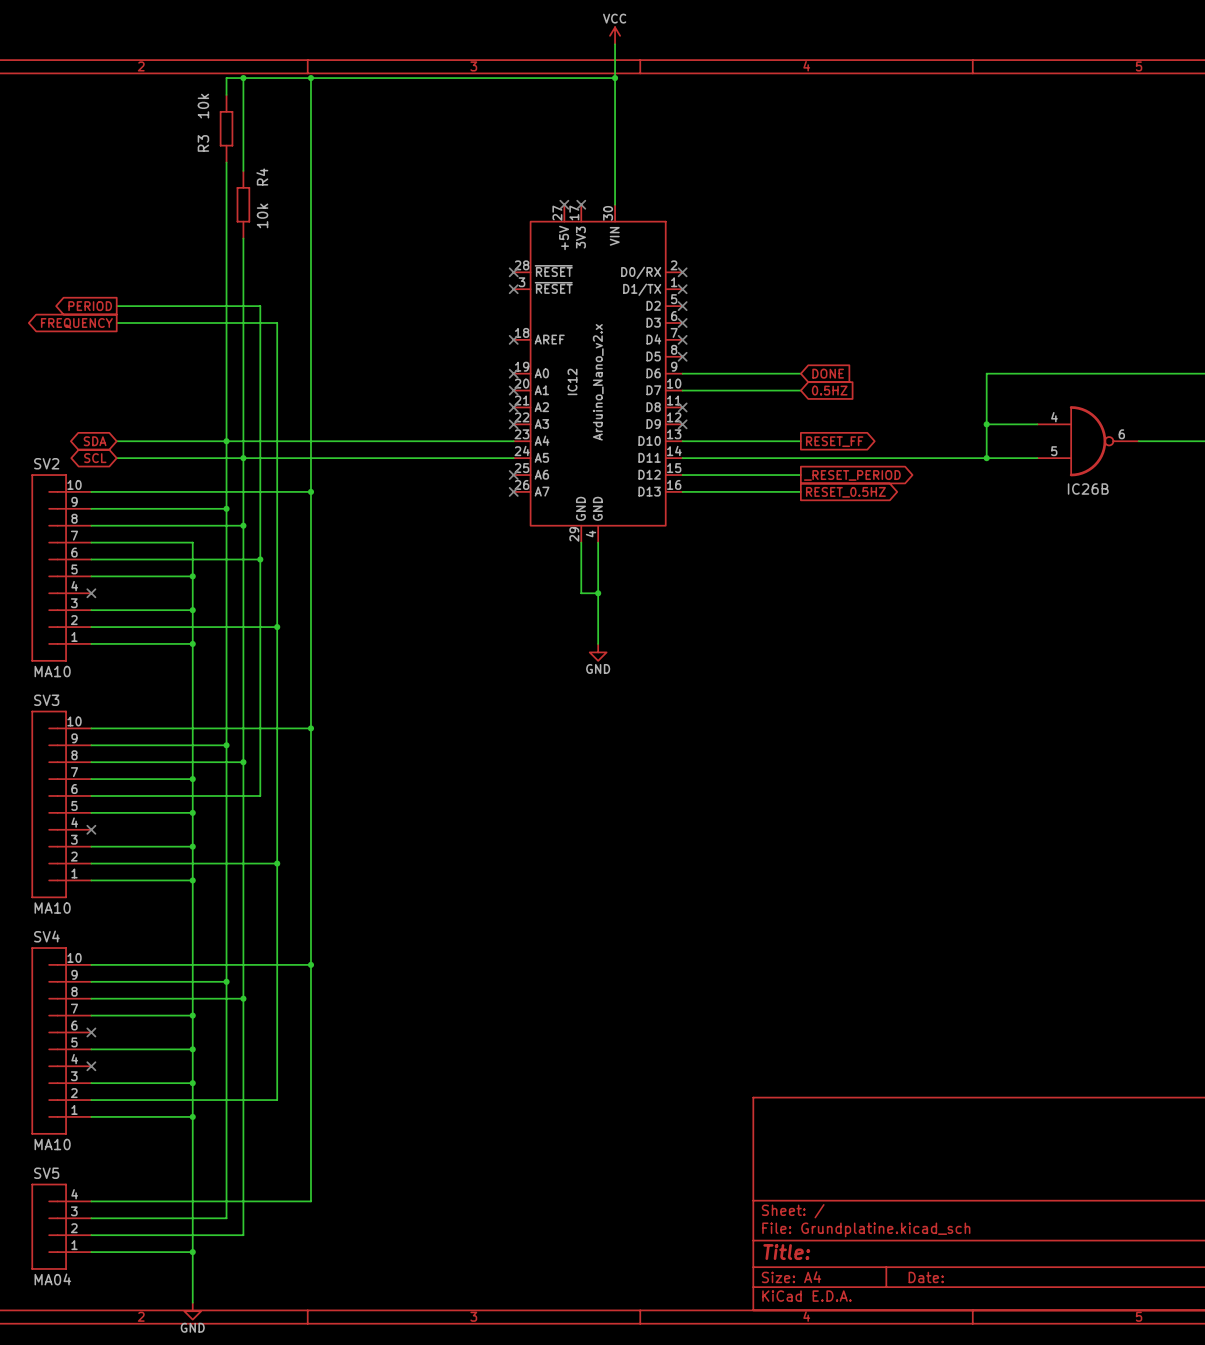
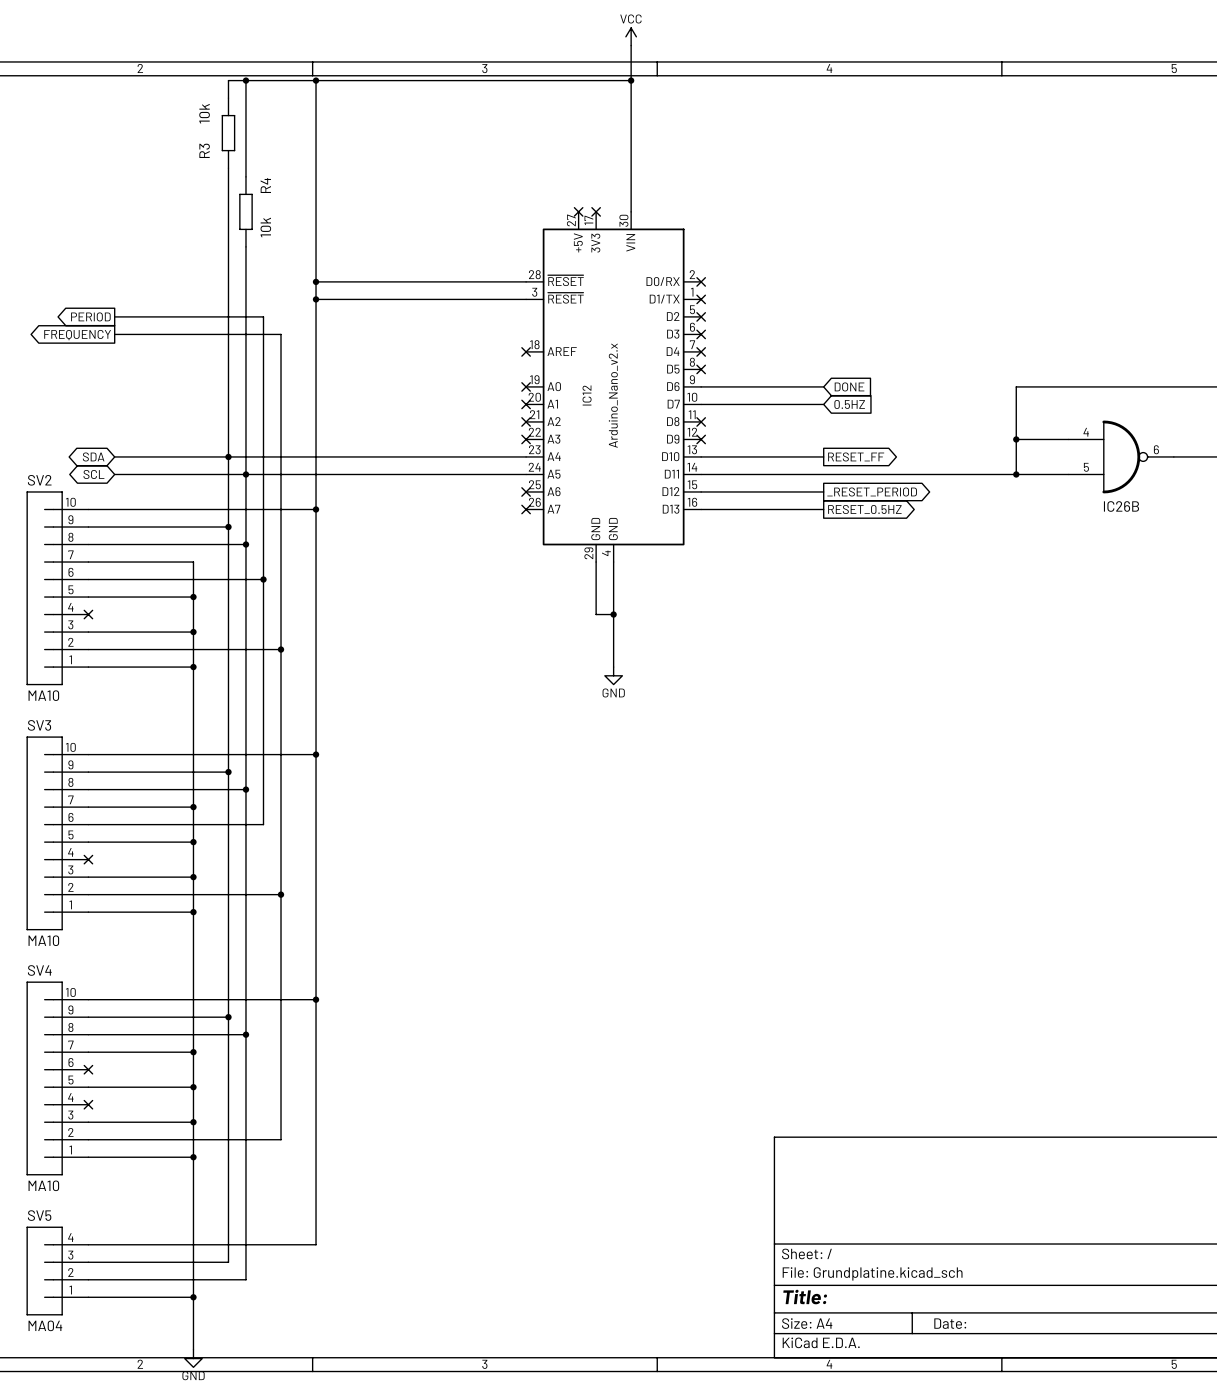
wire: none -> (316, 281) (526, 281)
junction: none -> (316, 281)
no-connect mark: (513, 272) -> none
wire: none -> (316, 299) (526, 299)
junction: none -> (316, 299)
no-connect mark: (513, 289) -> none

